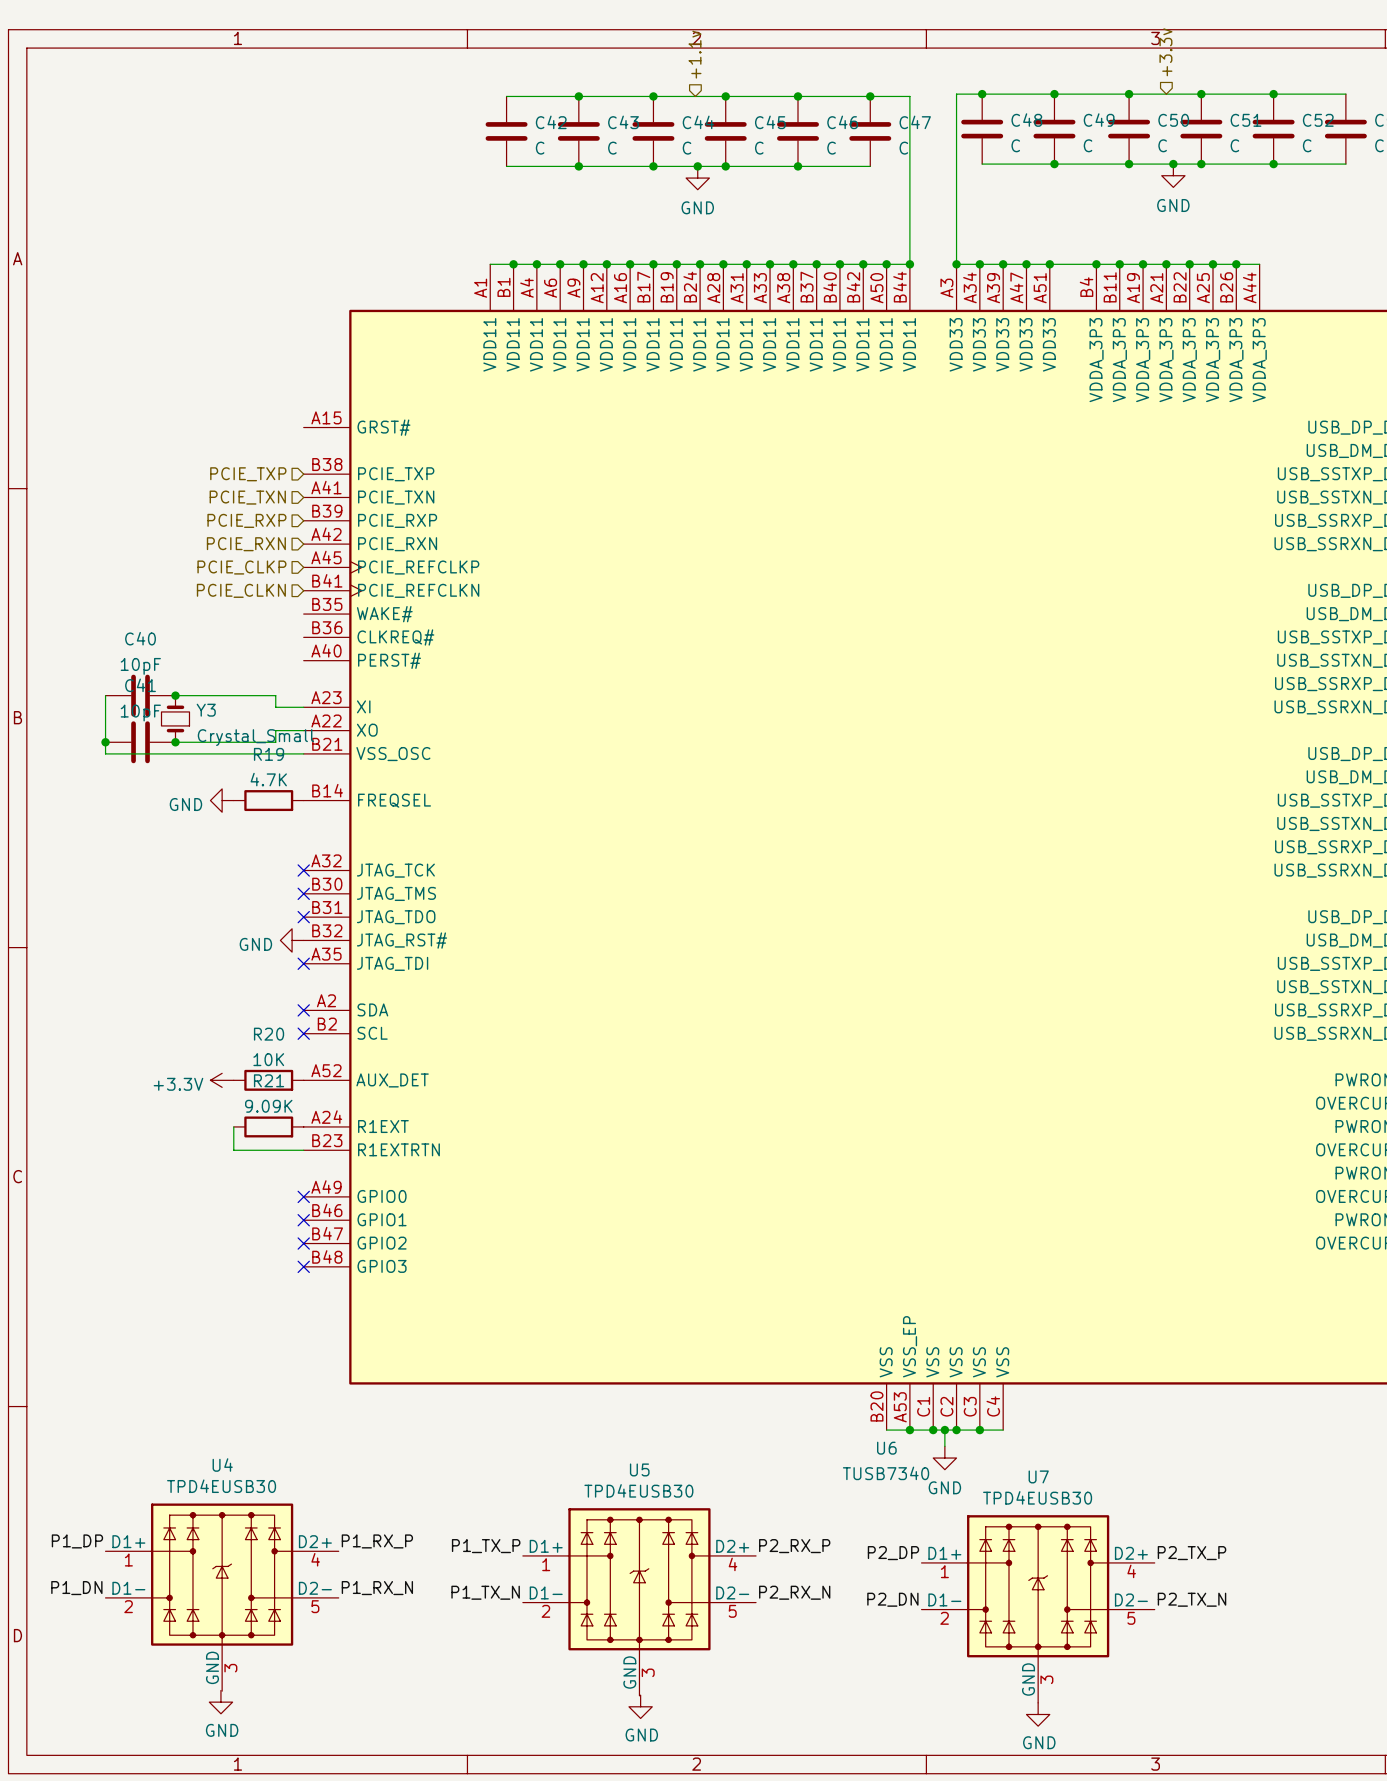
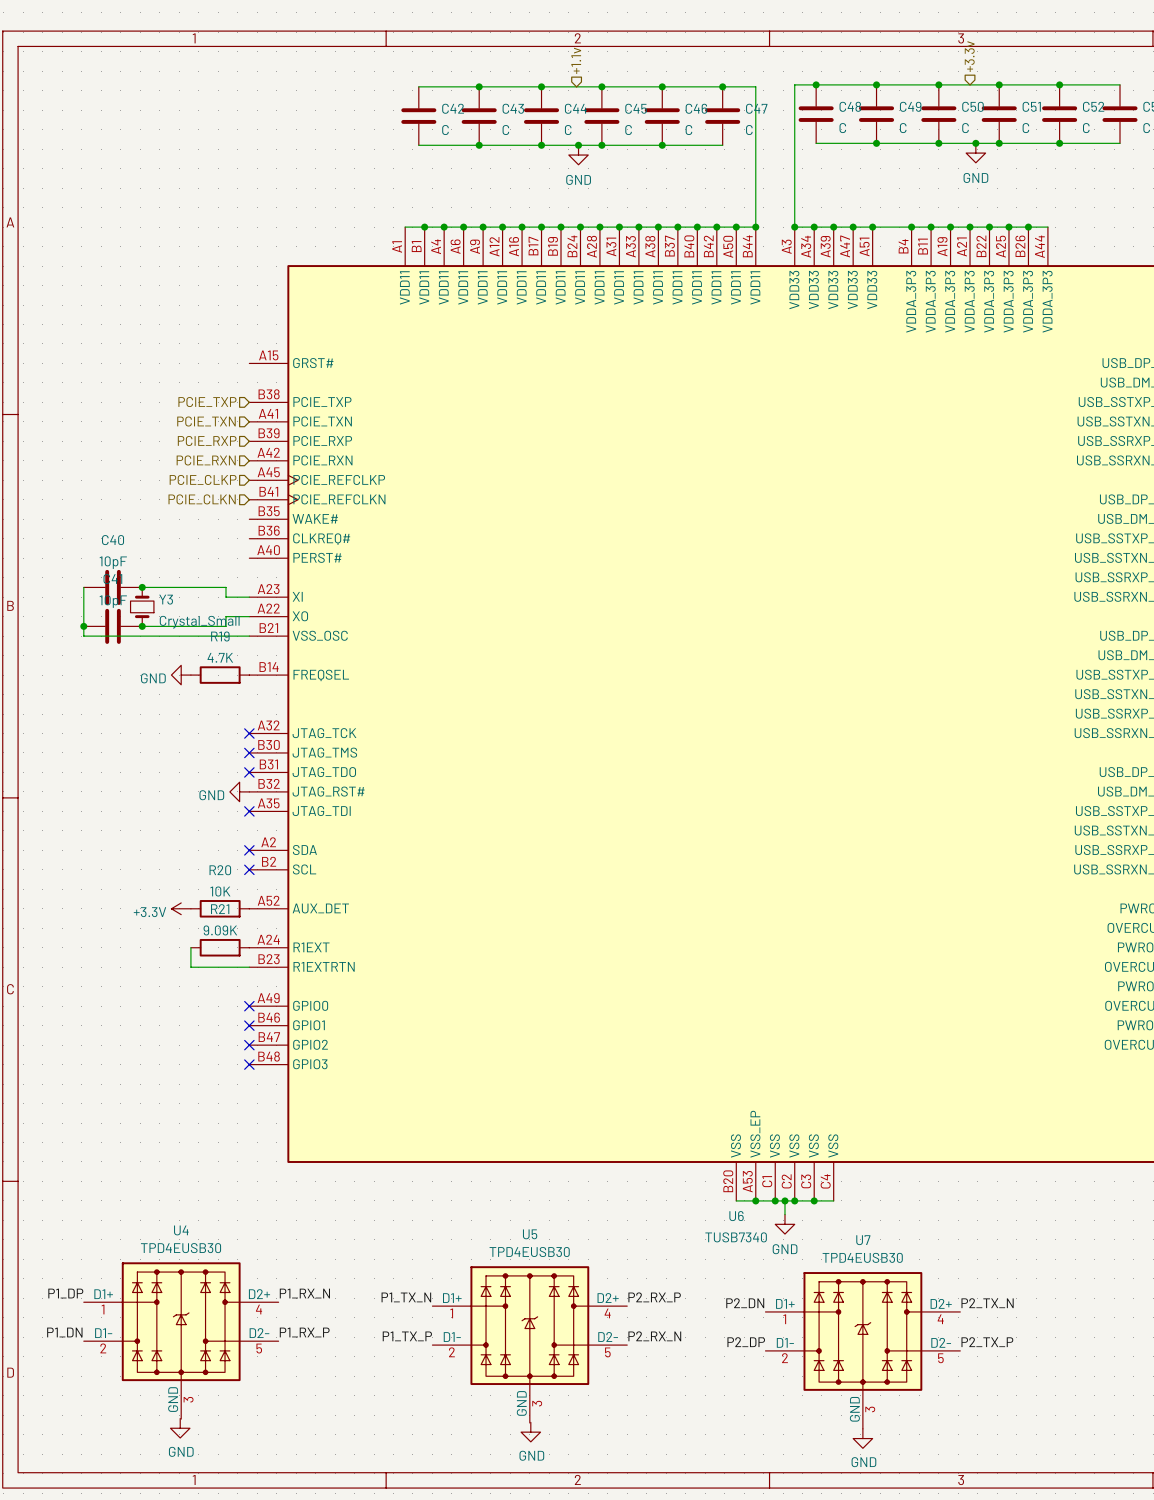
label: P1_RX_P (377, 1541) -> P1_RX_N (304, 1293)
label: P1_TX_P (486, 1546) -> P1_TX_N (406, 1297)
label: P2_DP (893, 1553) -> P2_DN (745, 1303)
label: P2_TX_P (1191, 1553) -> P2_TX_N (987, 1303)
label: P1_RX_N (377, 1588) -> P1_RX_P (304, 1332)
label: P1_TX_N (485, 1592) -> P1_TX_P (407, 1336)
label: P2_DN (892, 1599) -> P2_DP (746, 1342)
label: P2_TX_N (1191, 1599) -> P2_TX_P (987, 1342)

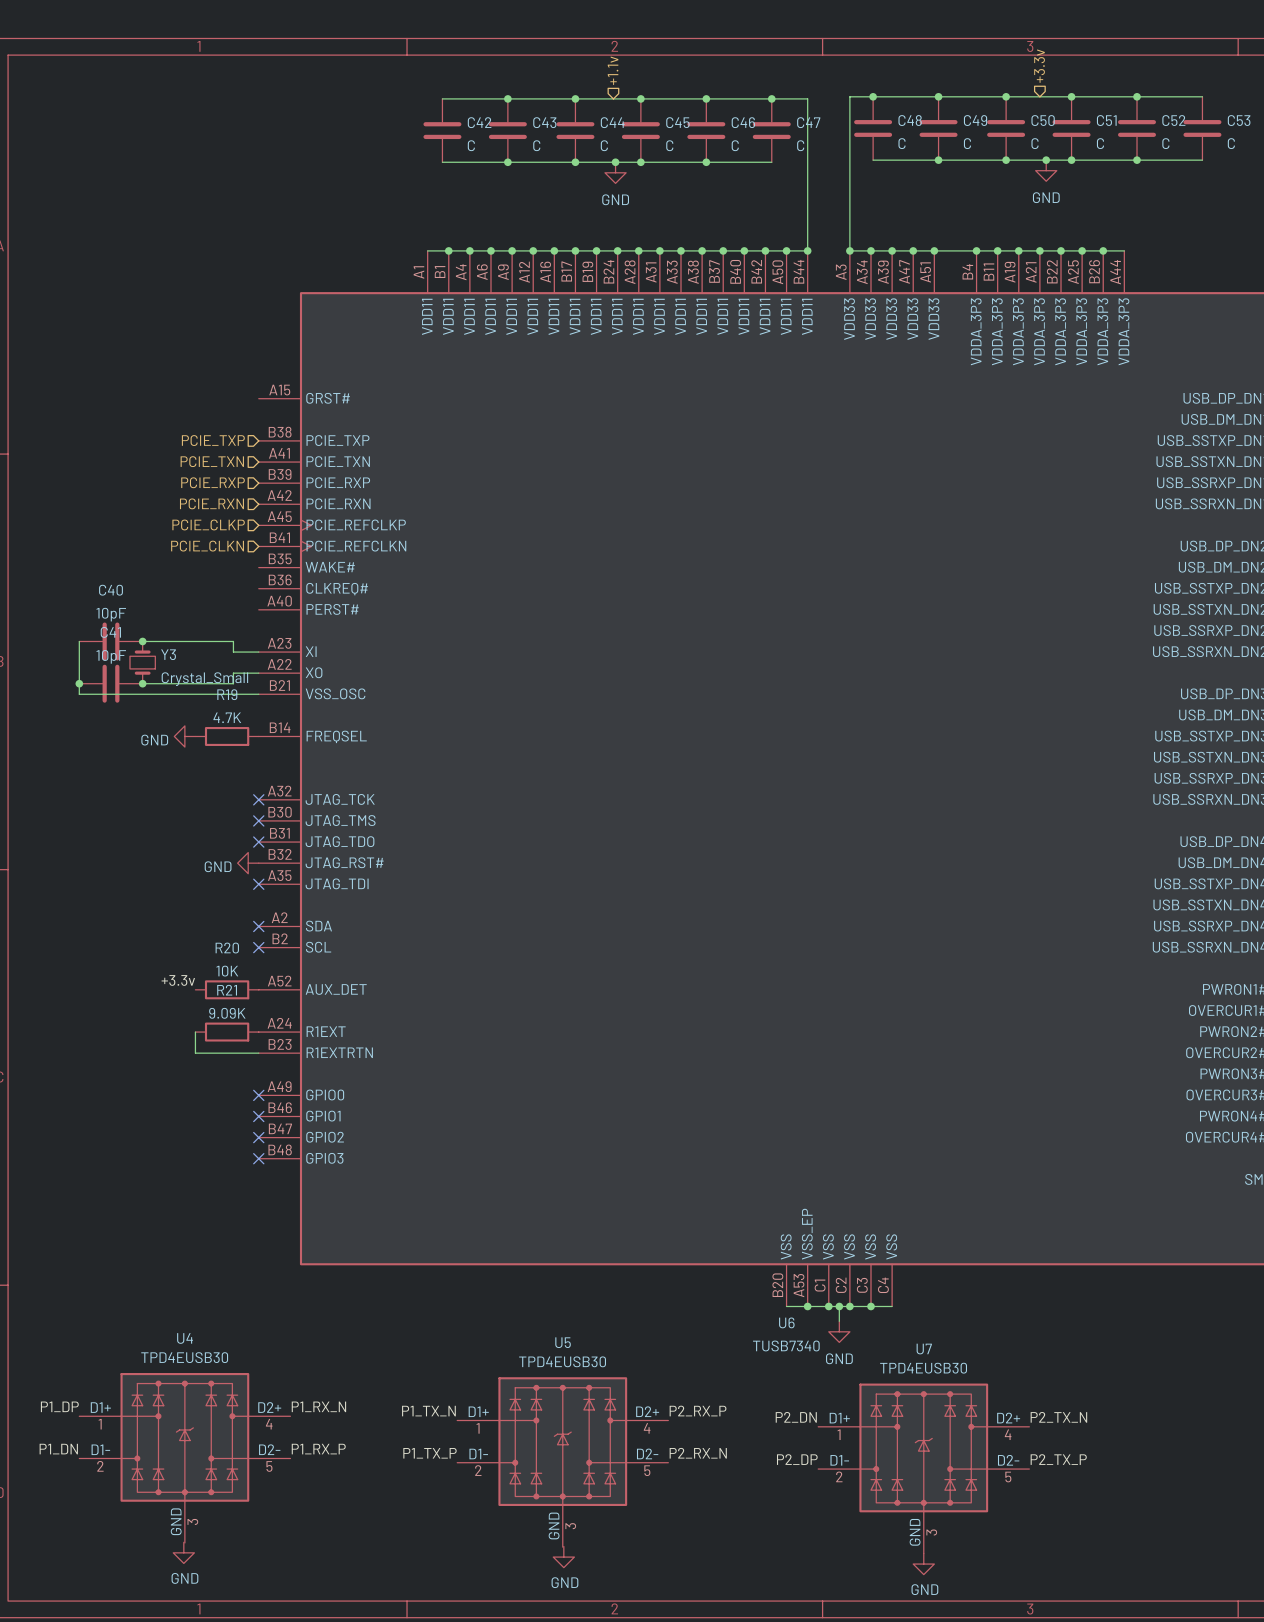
label: none -> +3.3v (178, 980)
power symbol: +3.3V (181, 908) -> none

